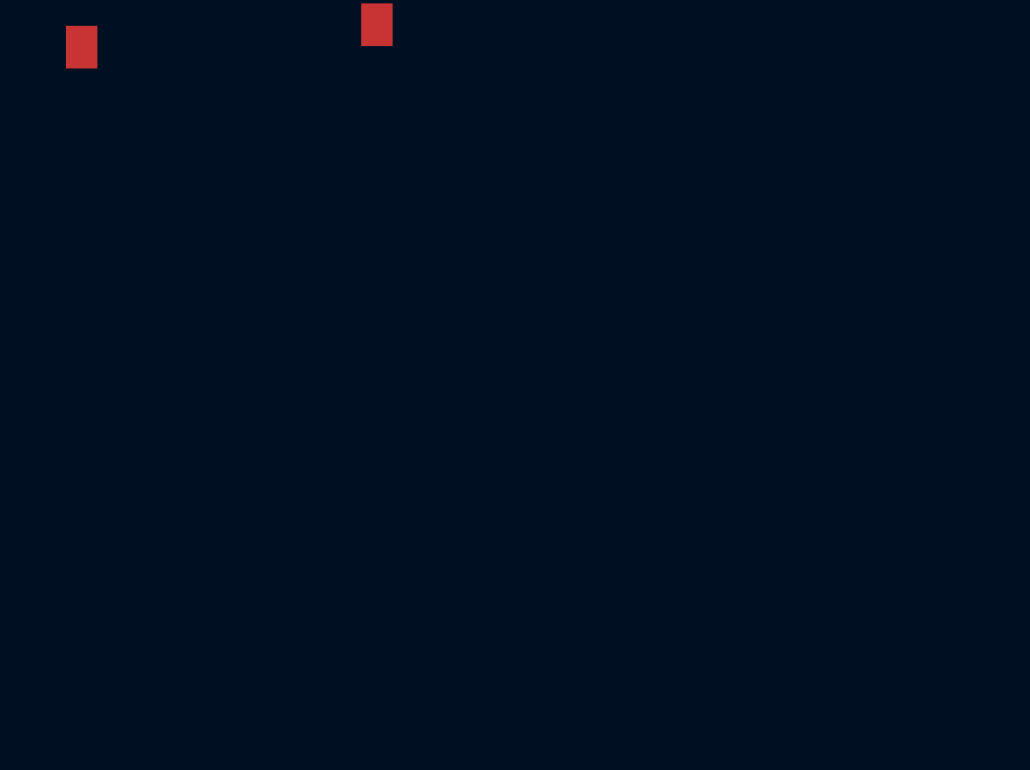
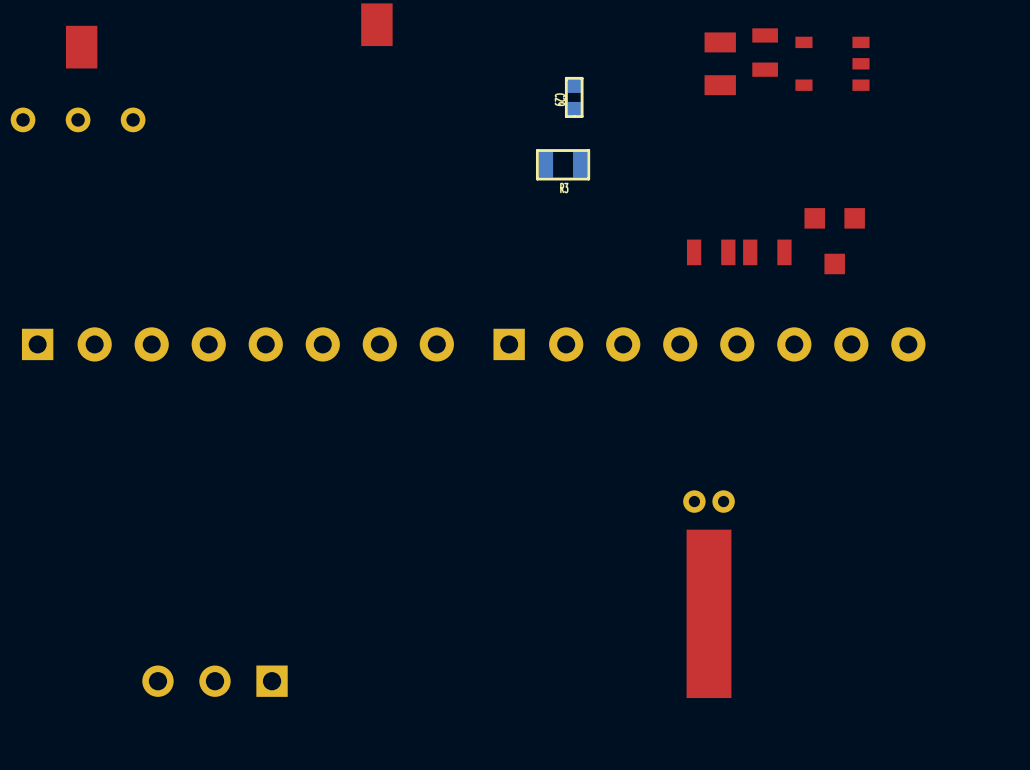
part: none -> (765, 52)
part: none -> (720, 63)
part: none -> (832, 63)
C29: none -> (574, 97)
part: none -> (78, 119)
R3: none -> (563, 164)
part: none -> (834, 241)
part: none -> (711, 252)
part: none -> (767, 252)
part: none -> (237, 344)
part: none -> (709, 344)
part: none -> (709, 594)
part: none -> (215, 681)

